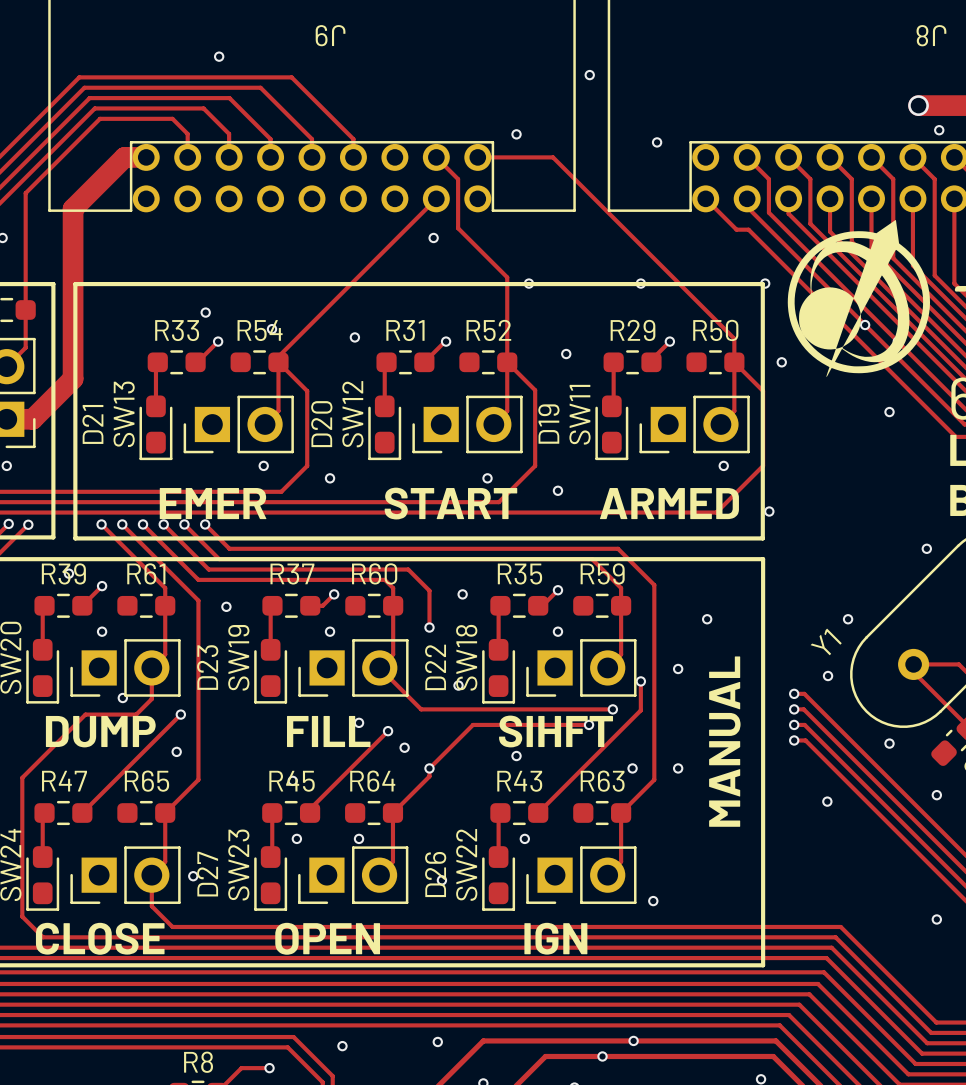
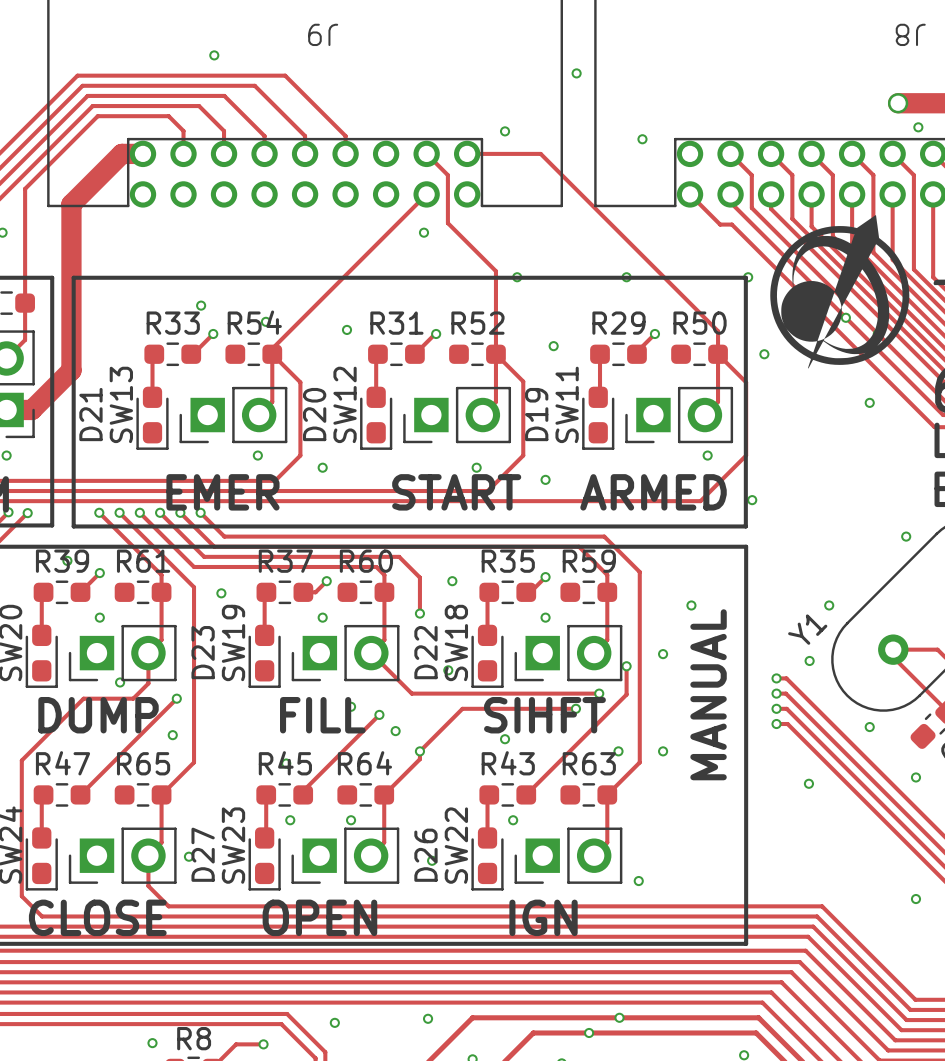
via: none -> (152, 1043)

